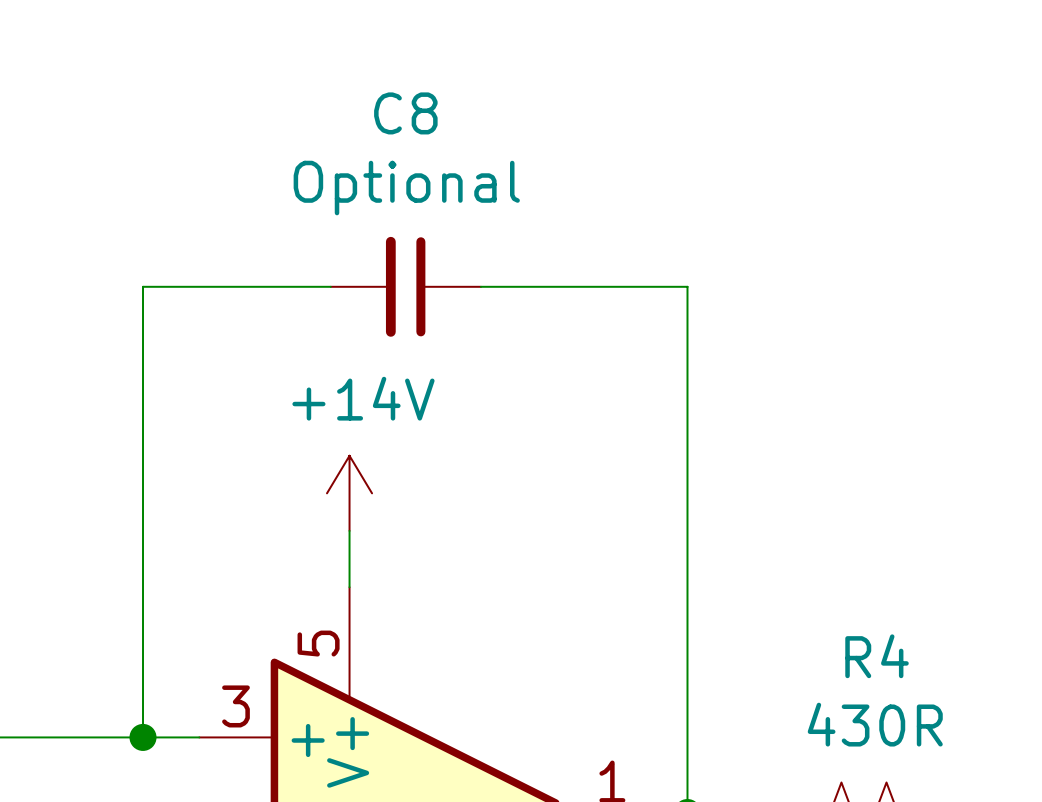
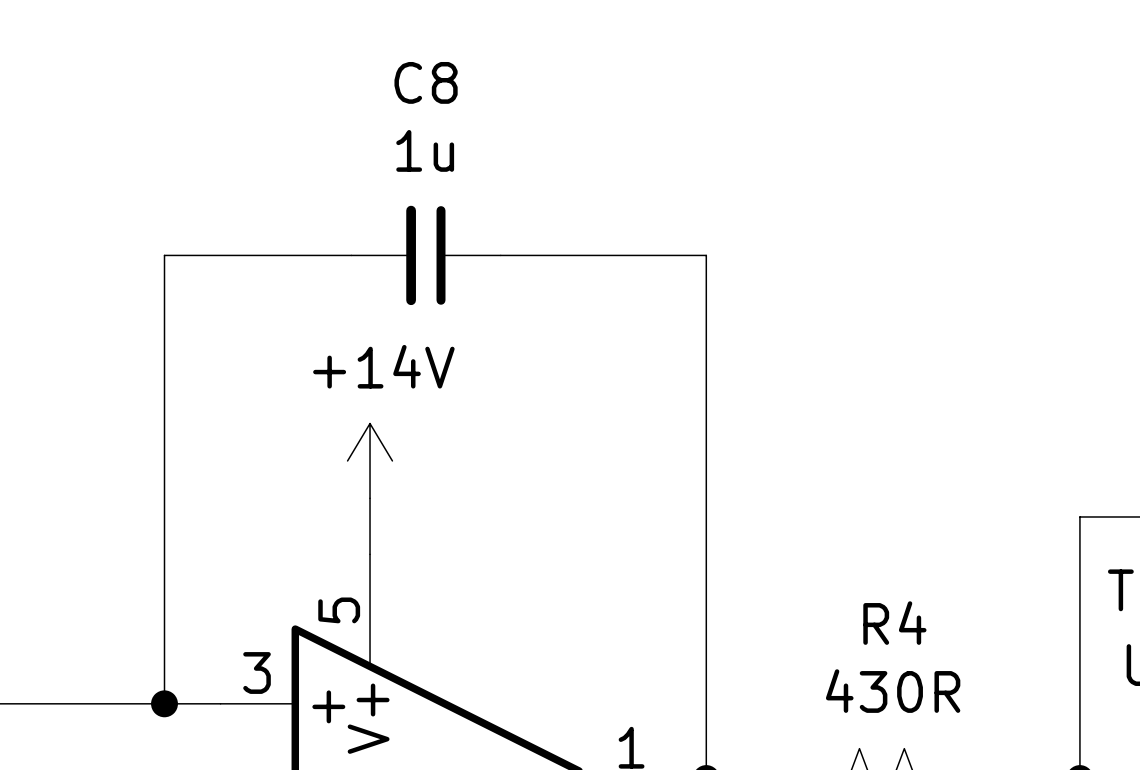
C8 value: Optional (406, 188) -> 1u (425, 150)

